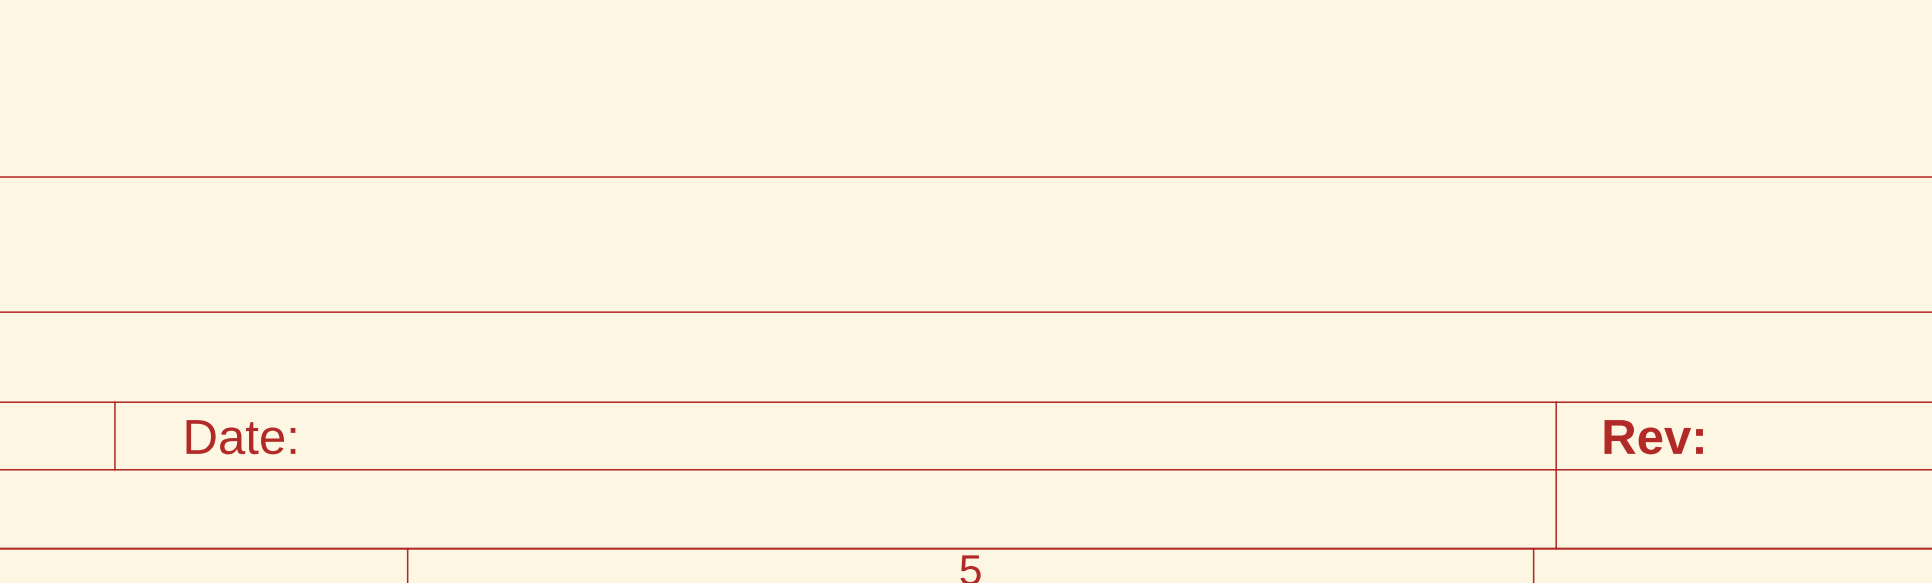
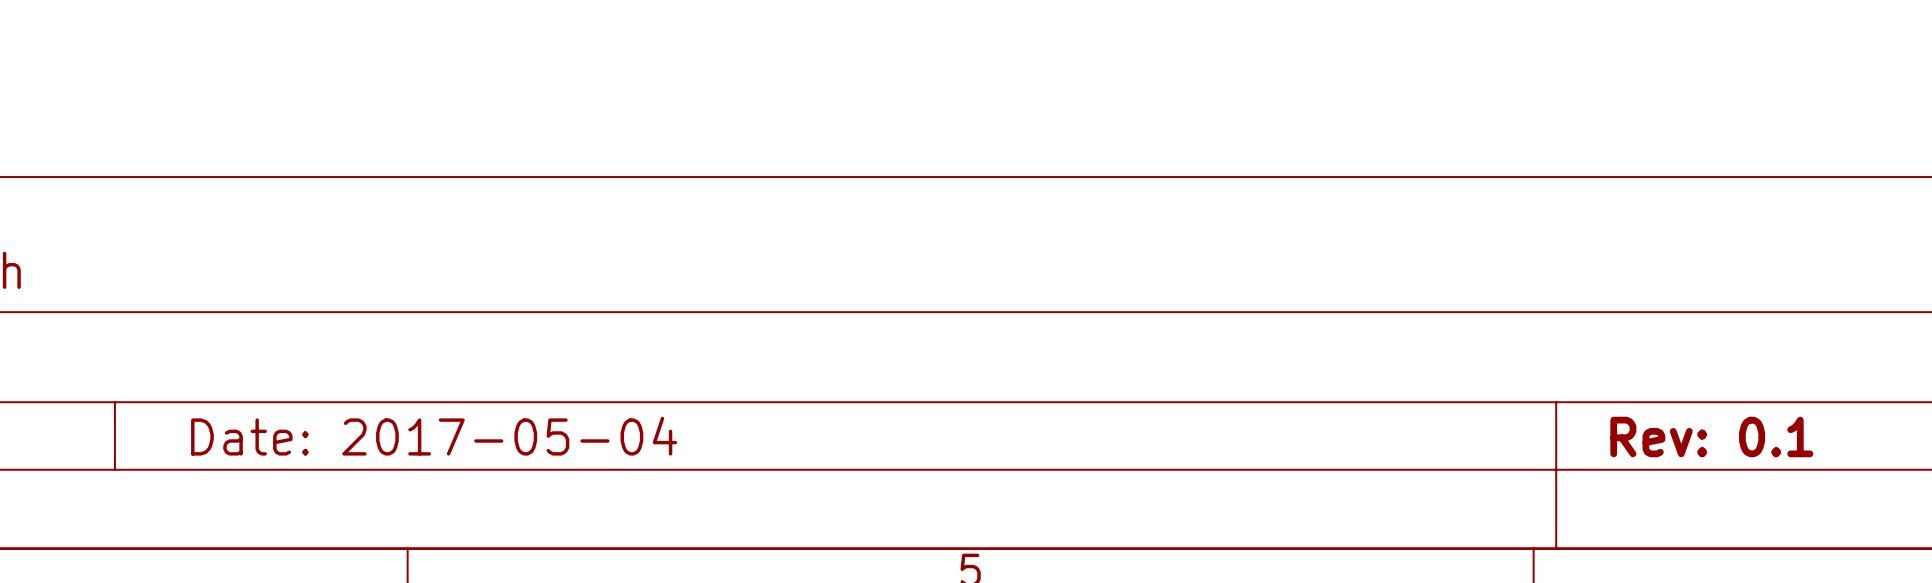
title block: Date: (240, 437) -> Date: 2017-05-04 (434, 436)
title block: Rev: (1653, 437) -> Rev: 0.1 (1711, 436)

